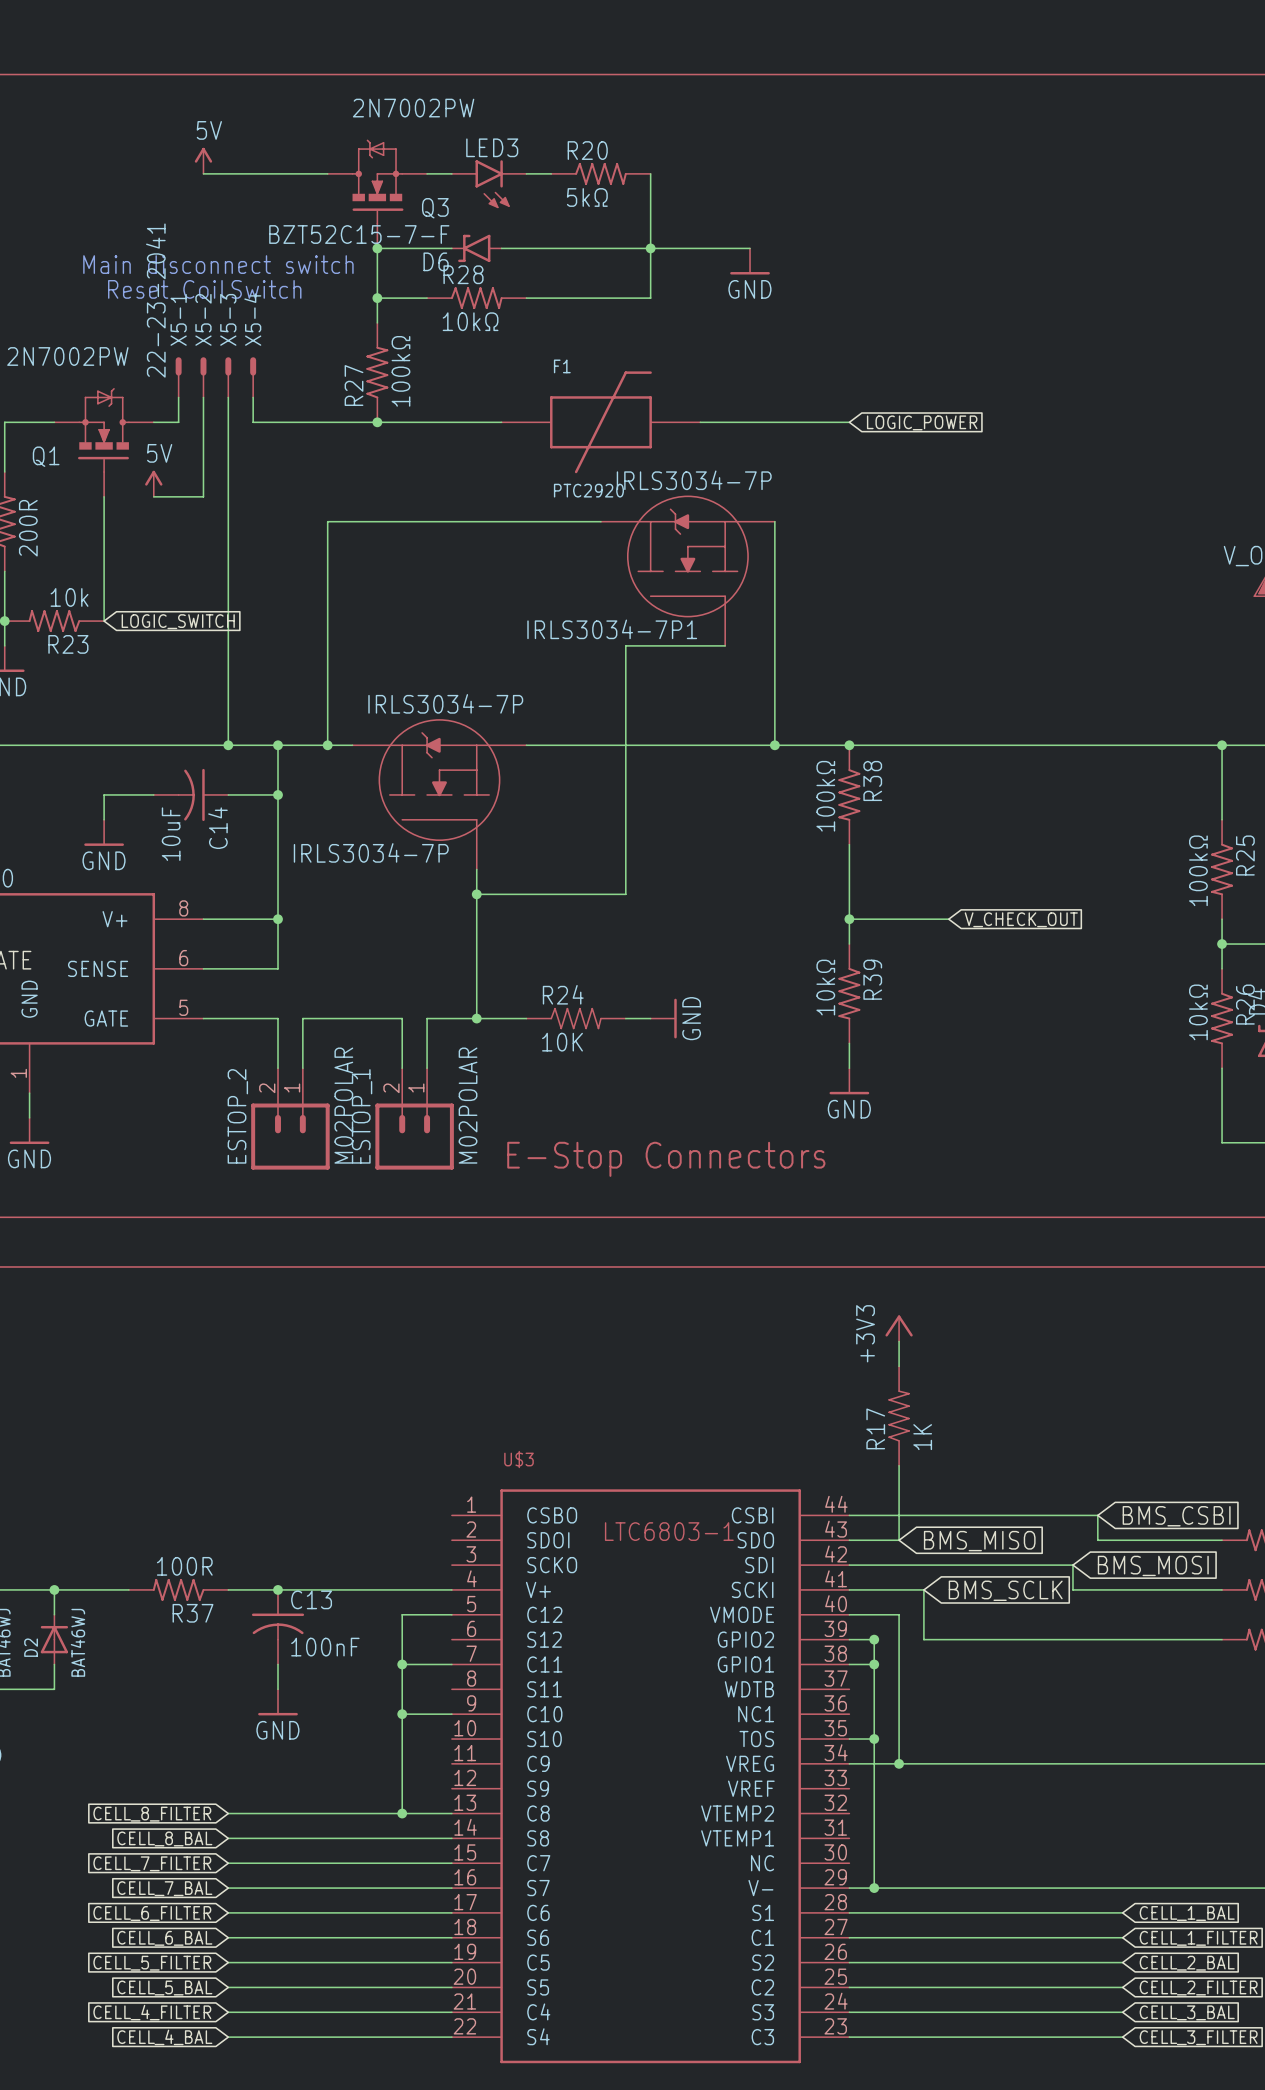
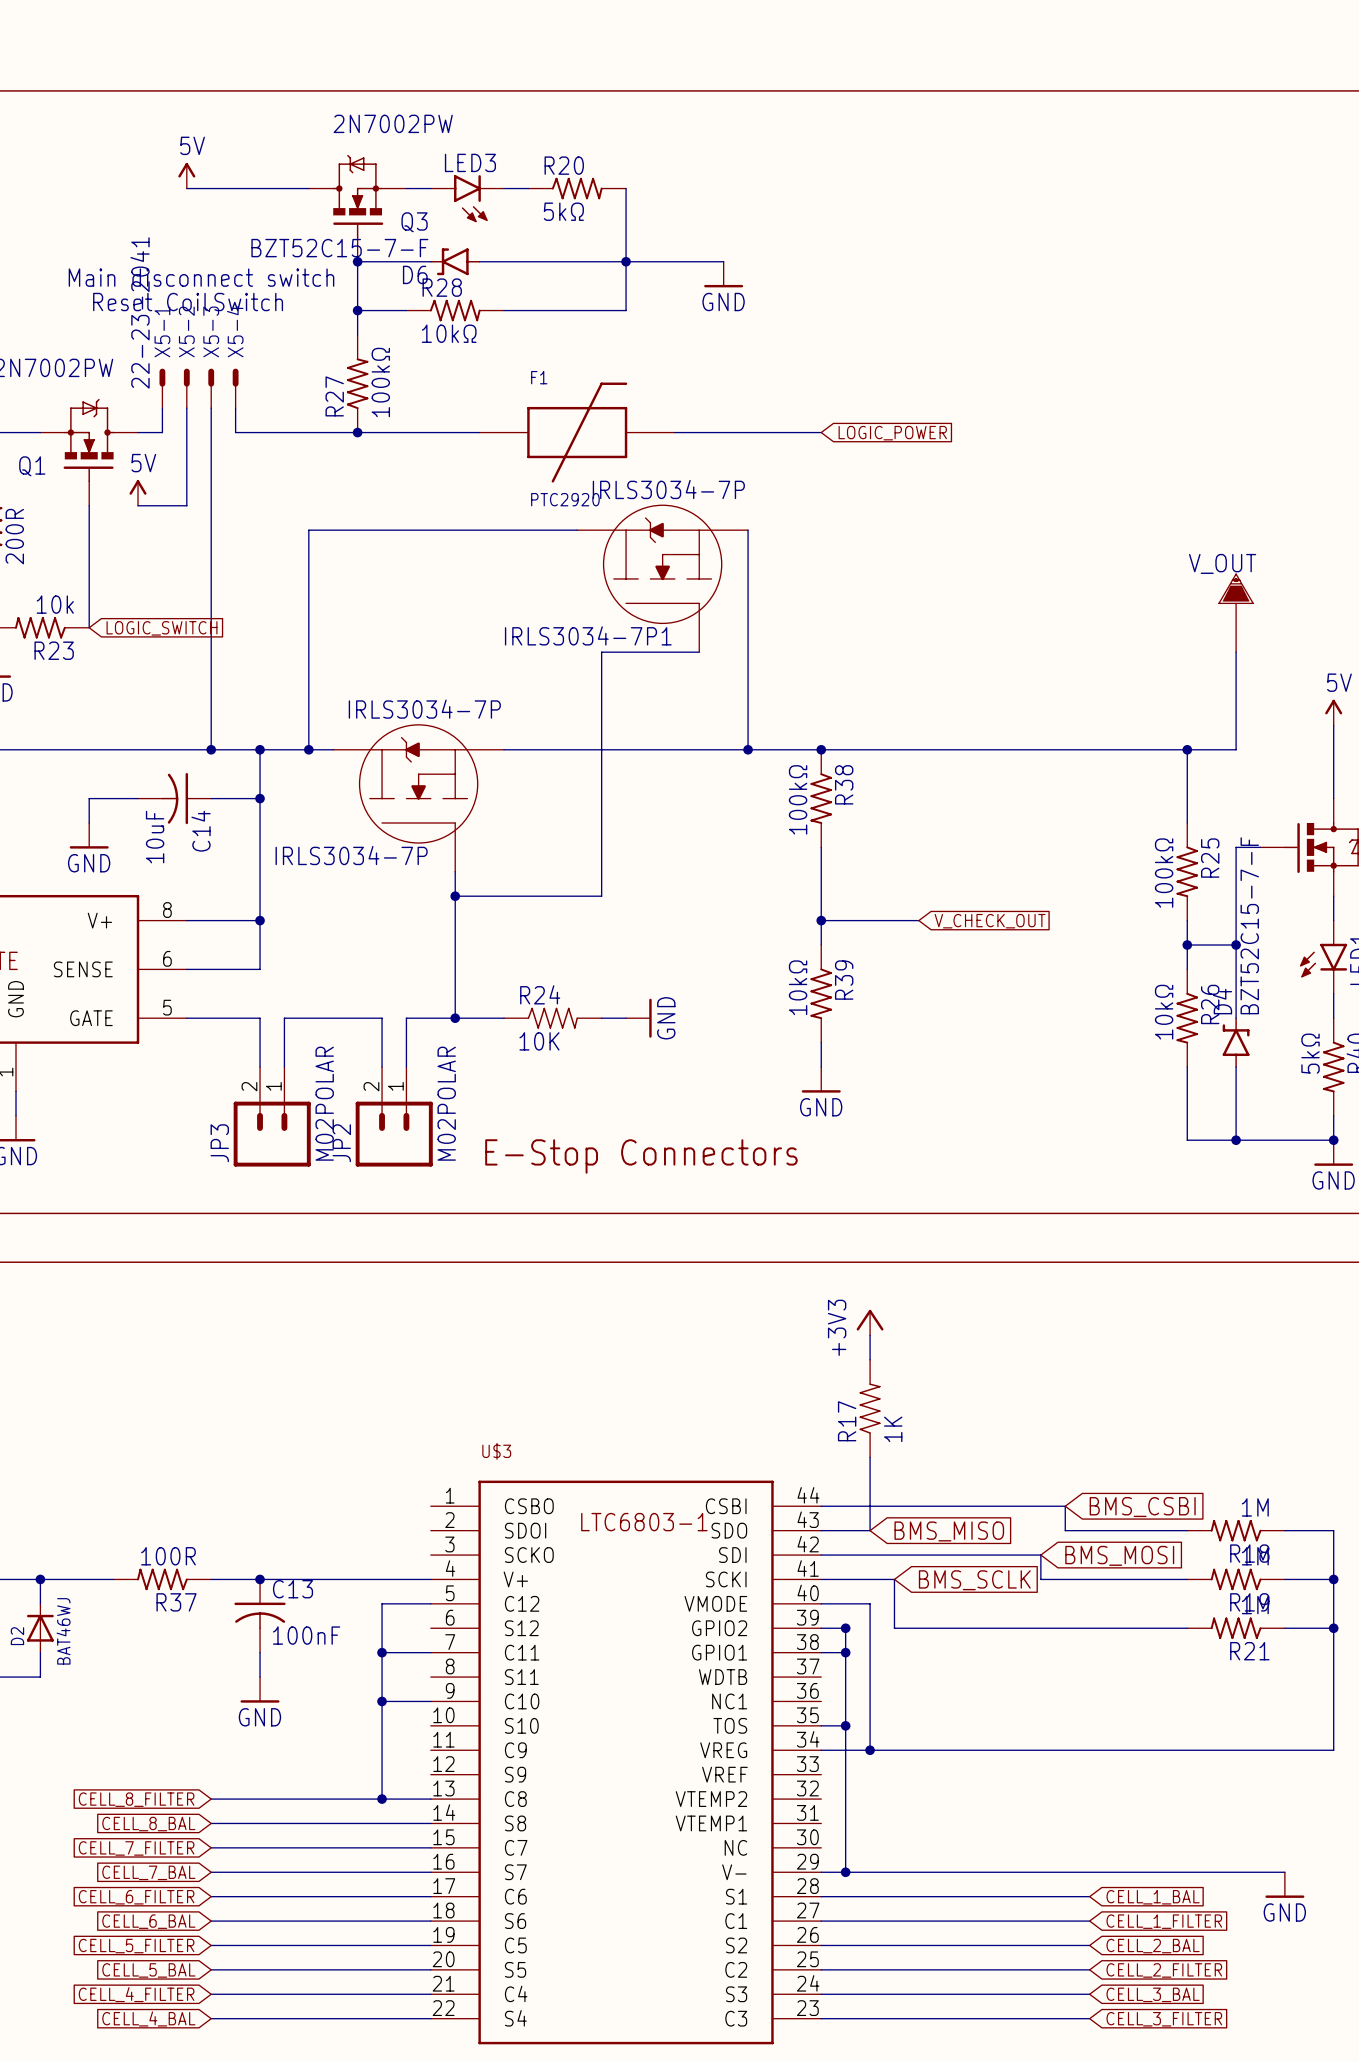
ESTOP_2 name: ESTOP_2 (237, 1116) -> JP3 (219, 1143)
ESTOP_1 name: ESTOP_1 (362, 1116) -> JP2 (341, 1143)

